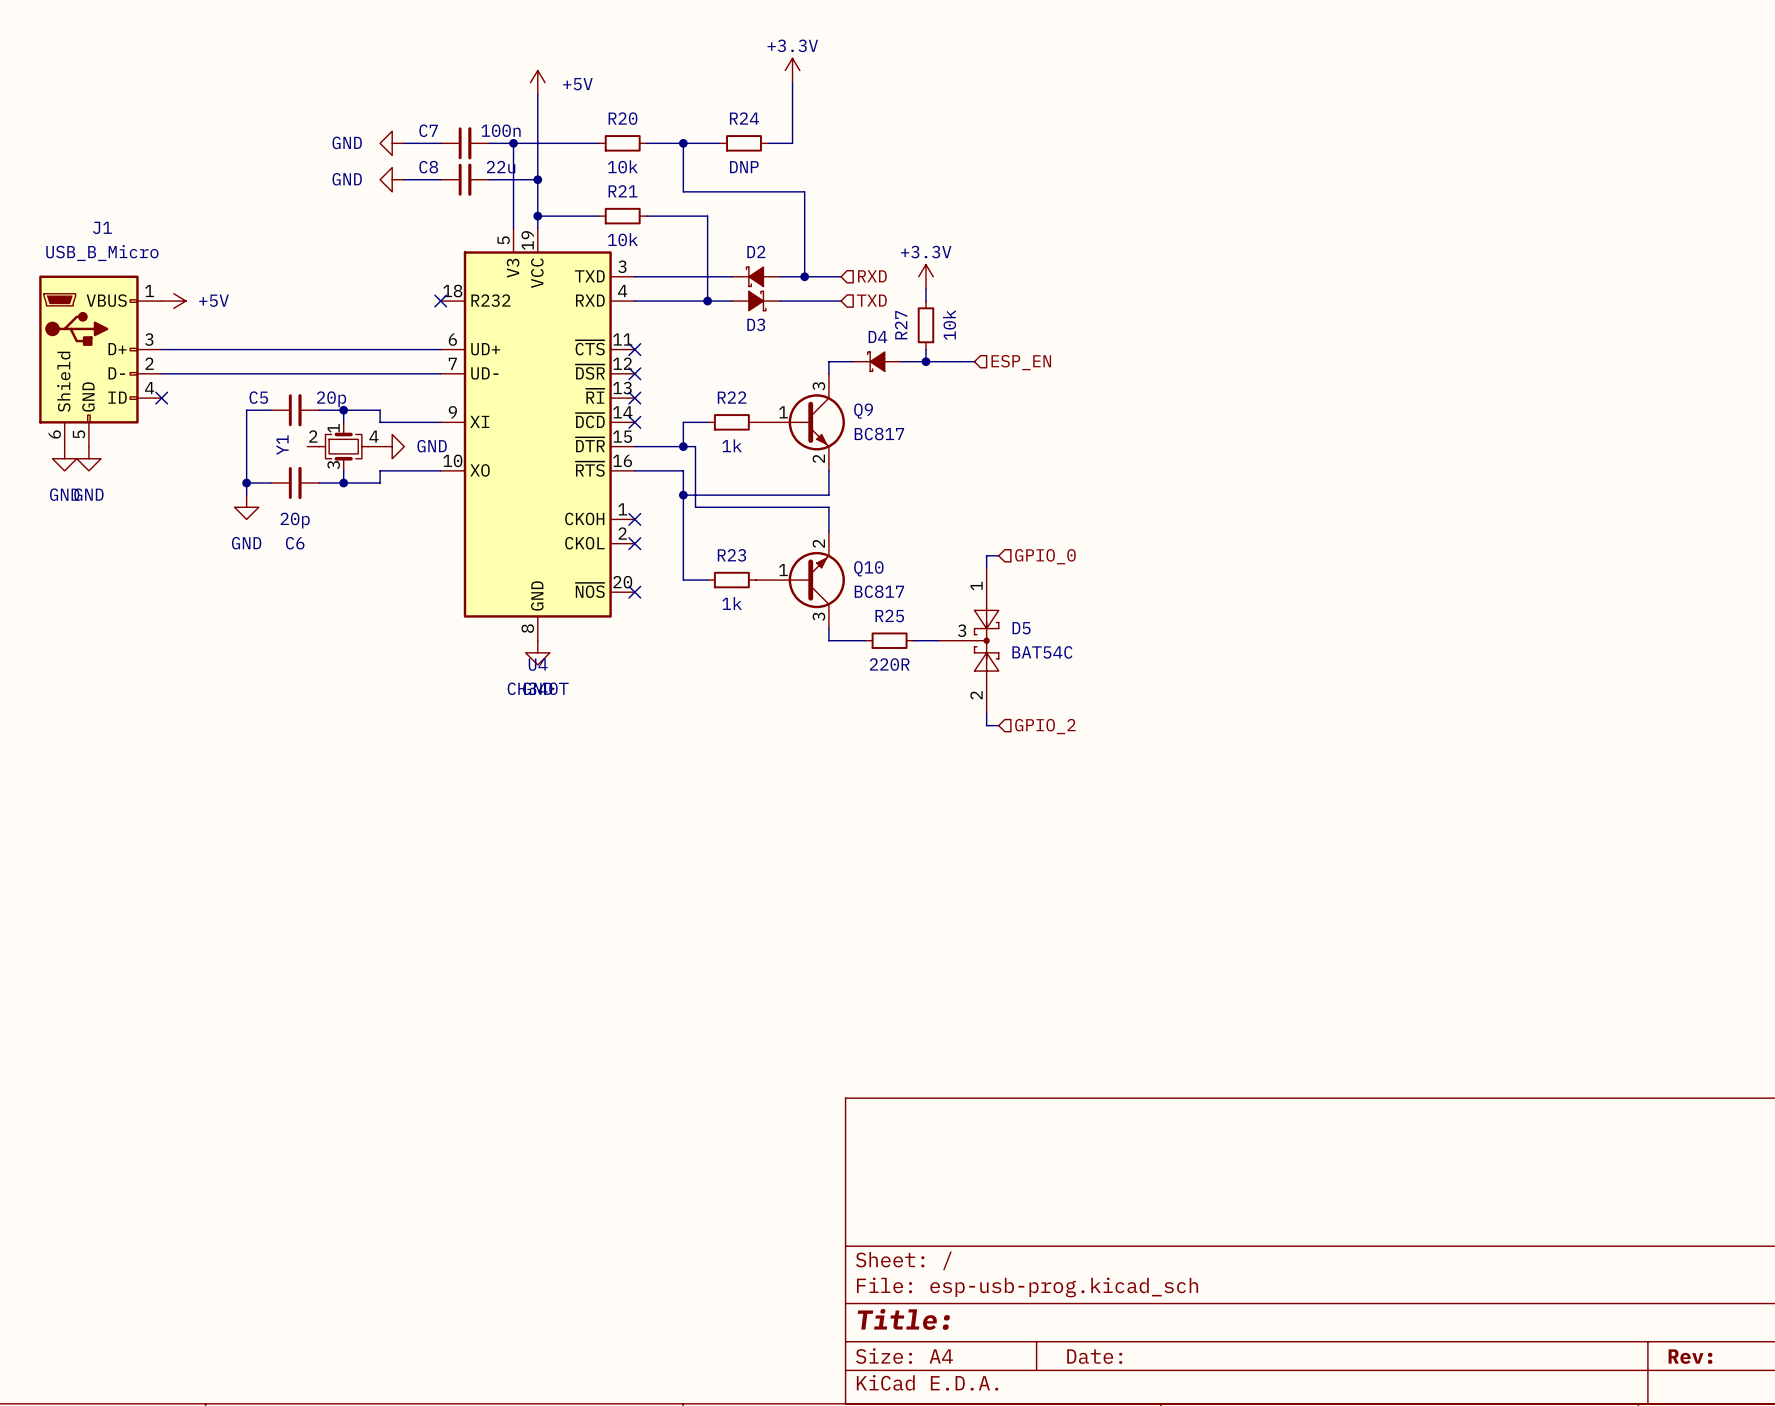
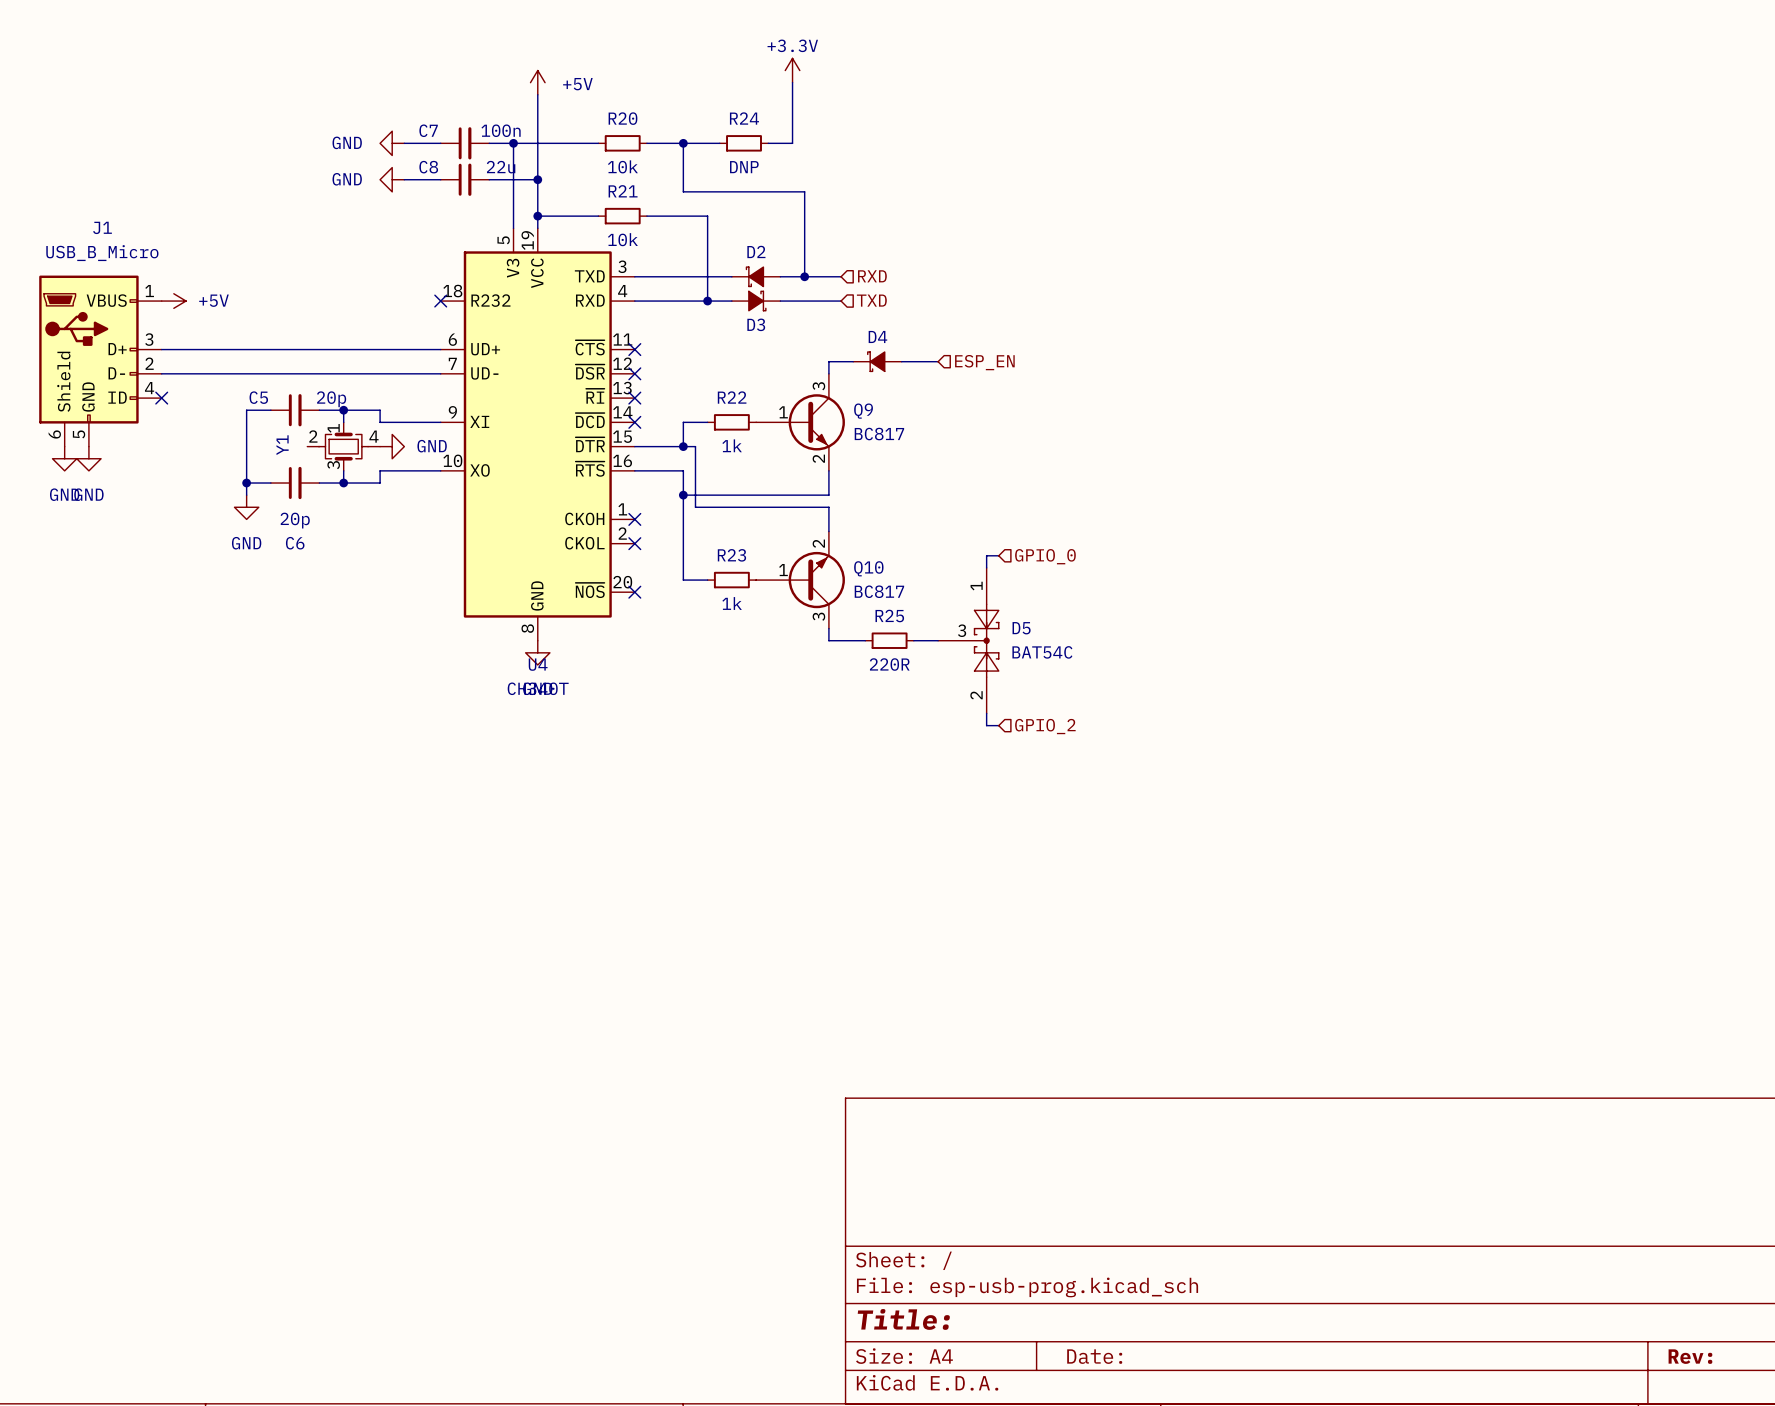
power symbol: +3.3V (925, 276) -> none
wire: (925, 288) (925, 301) -> none
R27: 10k (925, 325) -> none
wire: (925, 349) (925, 361) -> none
junction: (925, 361) -> none
wire: (938, 361) (974, 361) -> none
hierarchical label position: ESP_EN (1021, 362) -> ESP_EN (984, 362)

